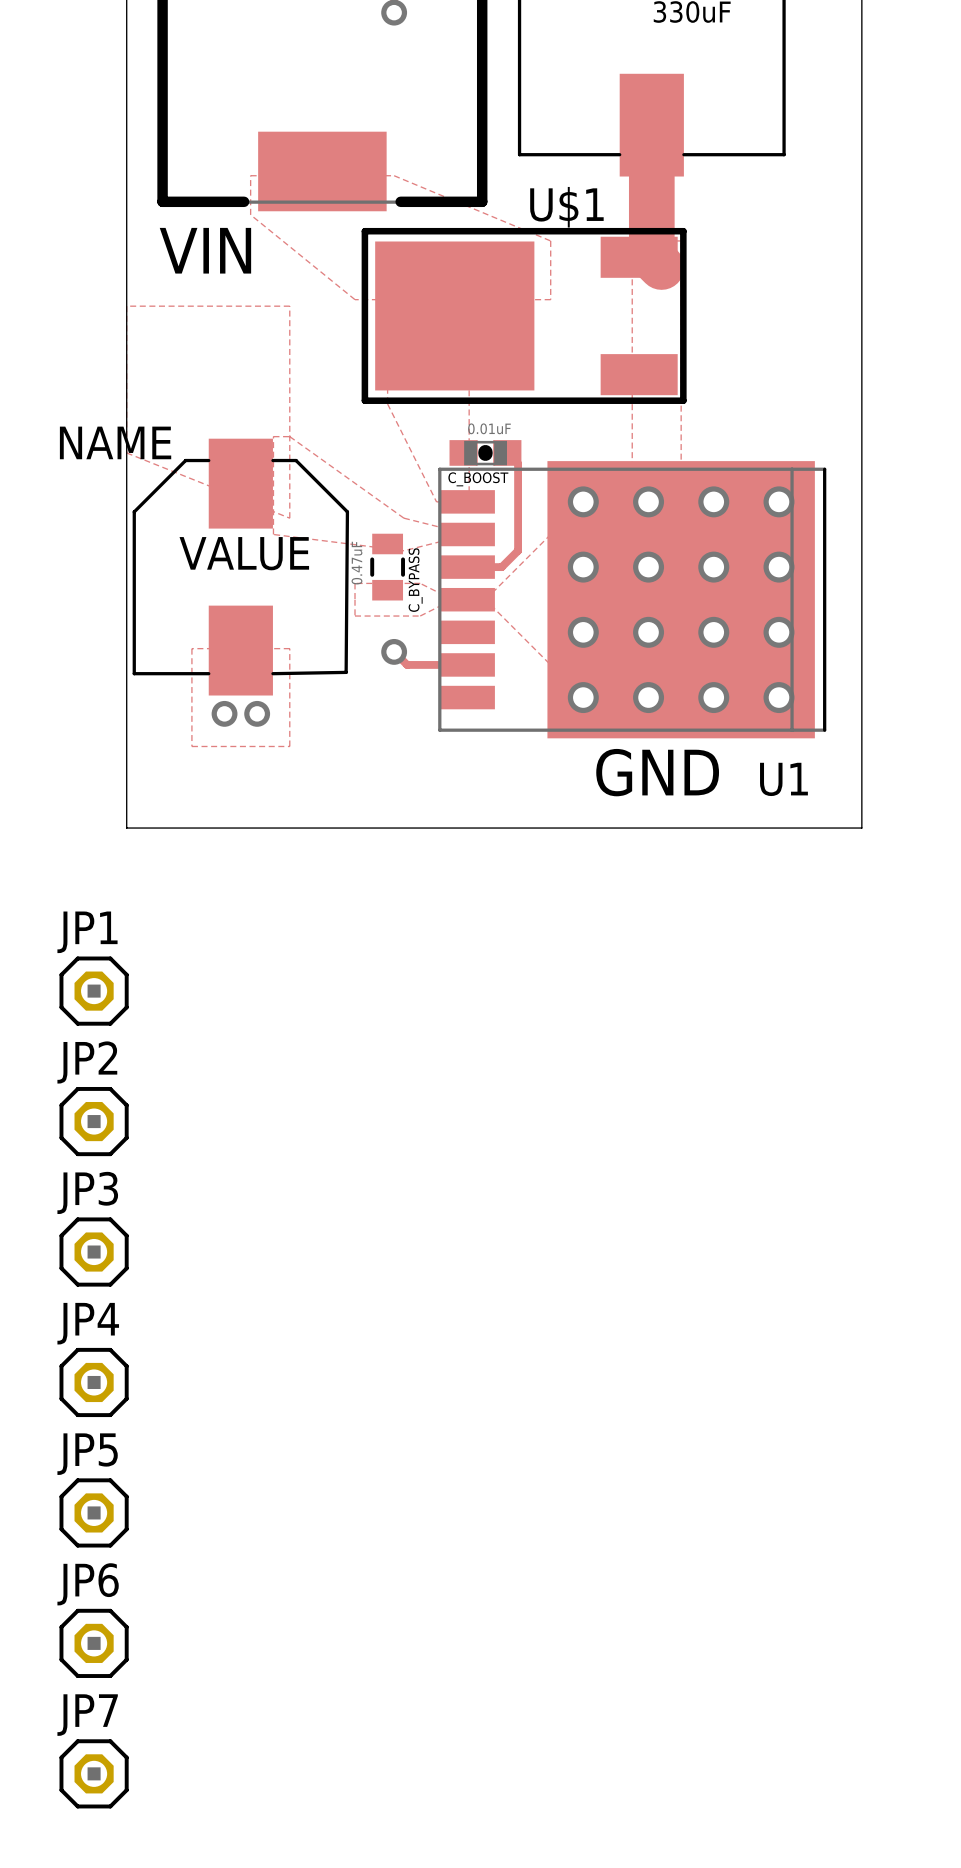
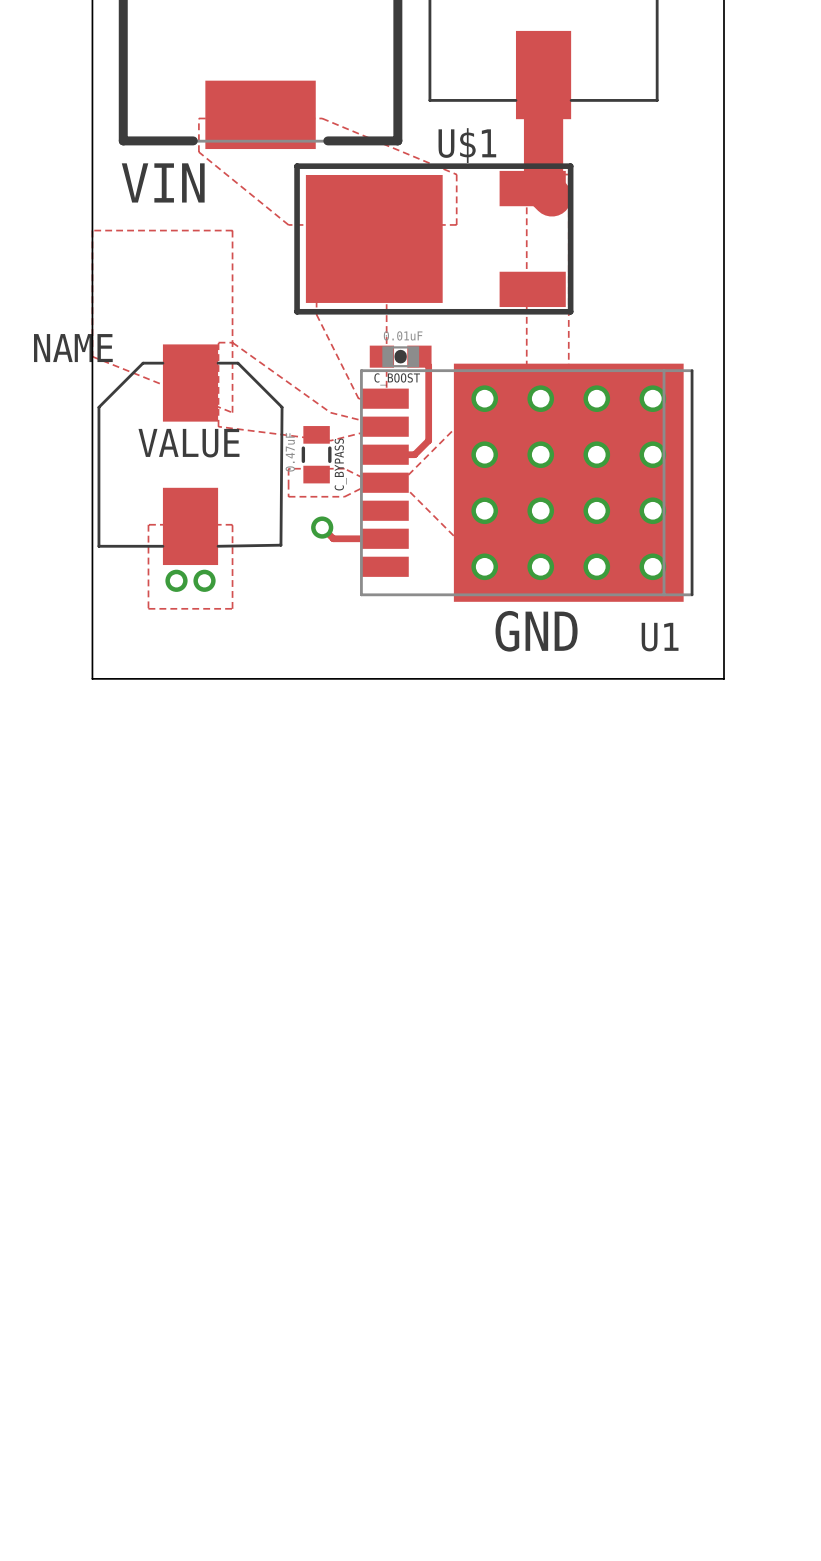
JP1: (94, 991) -> none
JP2: (94, 1121) -> none
JP3: (94, 1252) -> none
JP4: (94, 1382) -> none
JP5: (94, 1512) -> none
JP6: (94, 1643) -> none
JP7: (94, 1773) -> none

